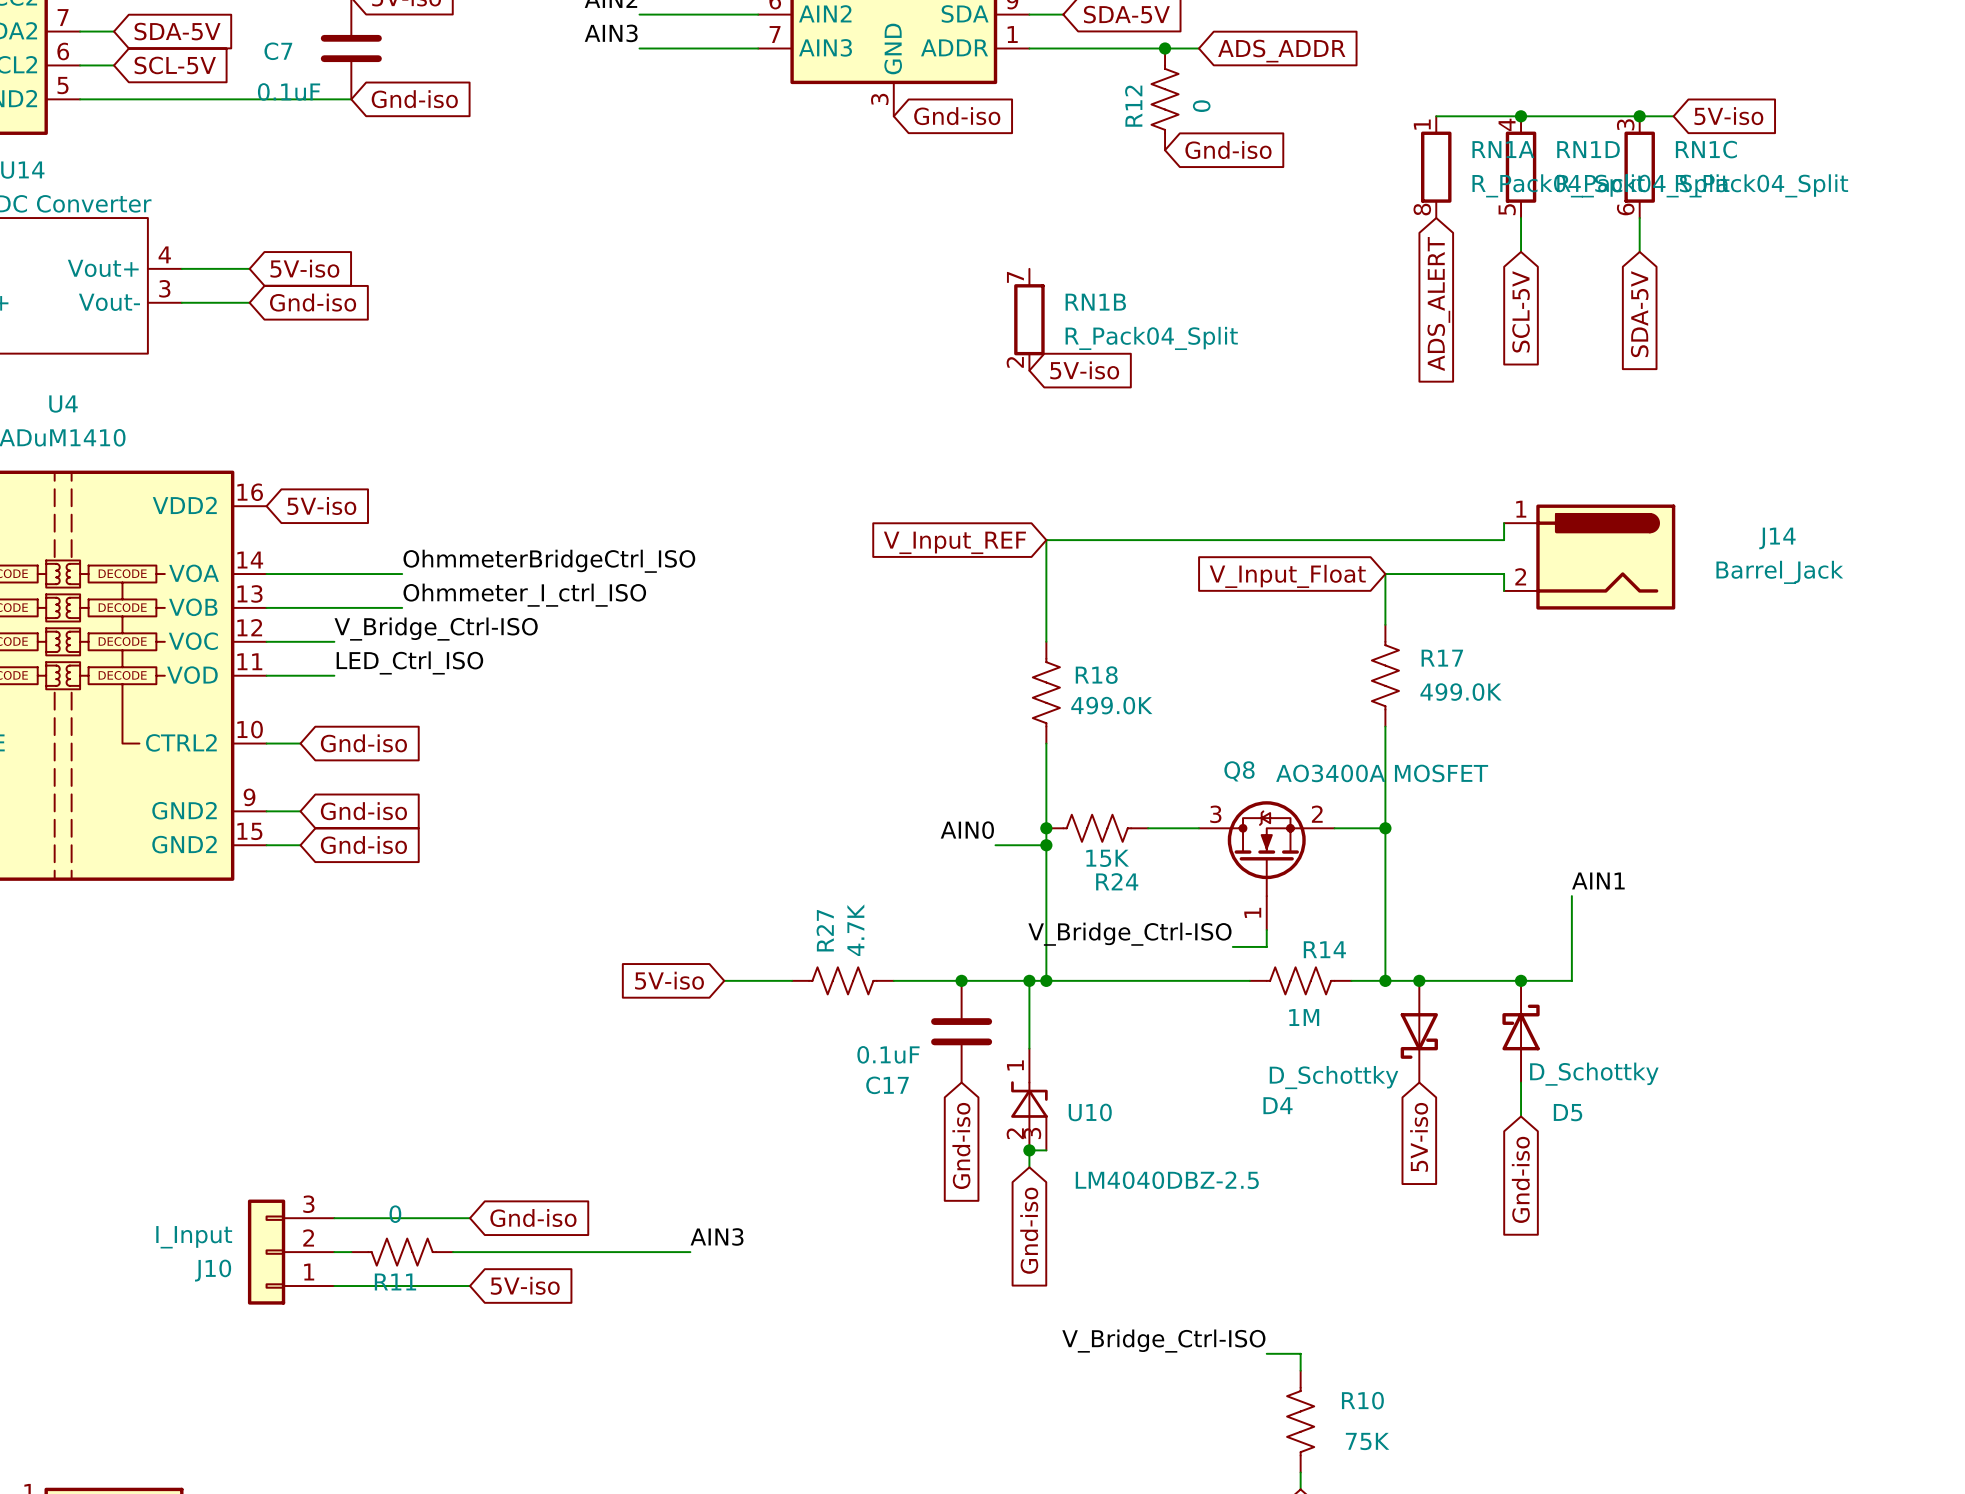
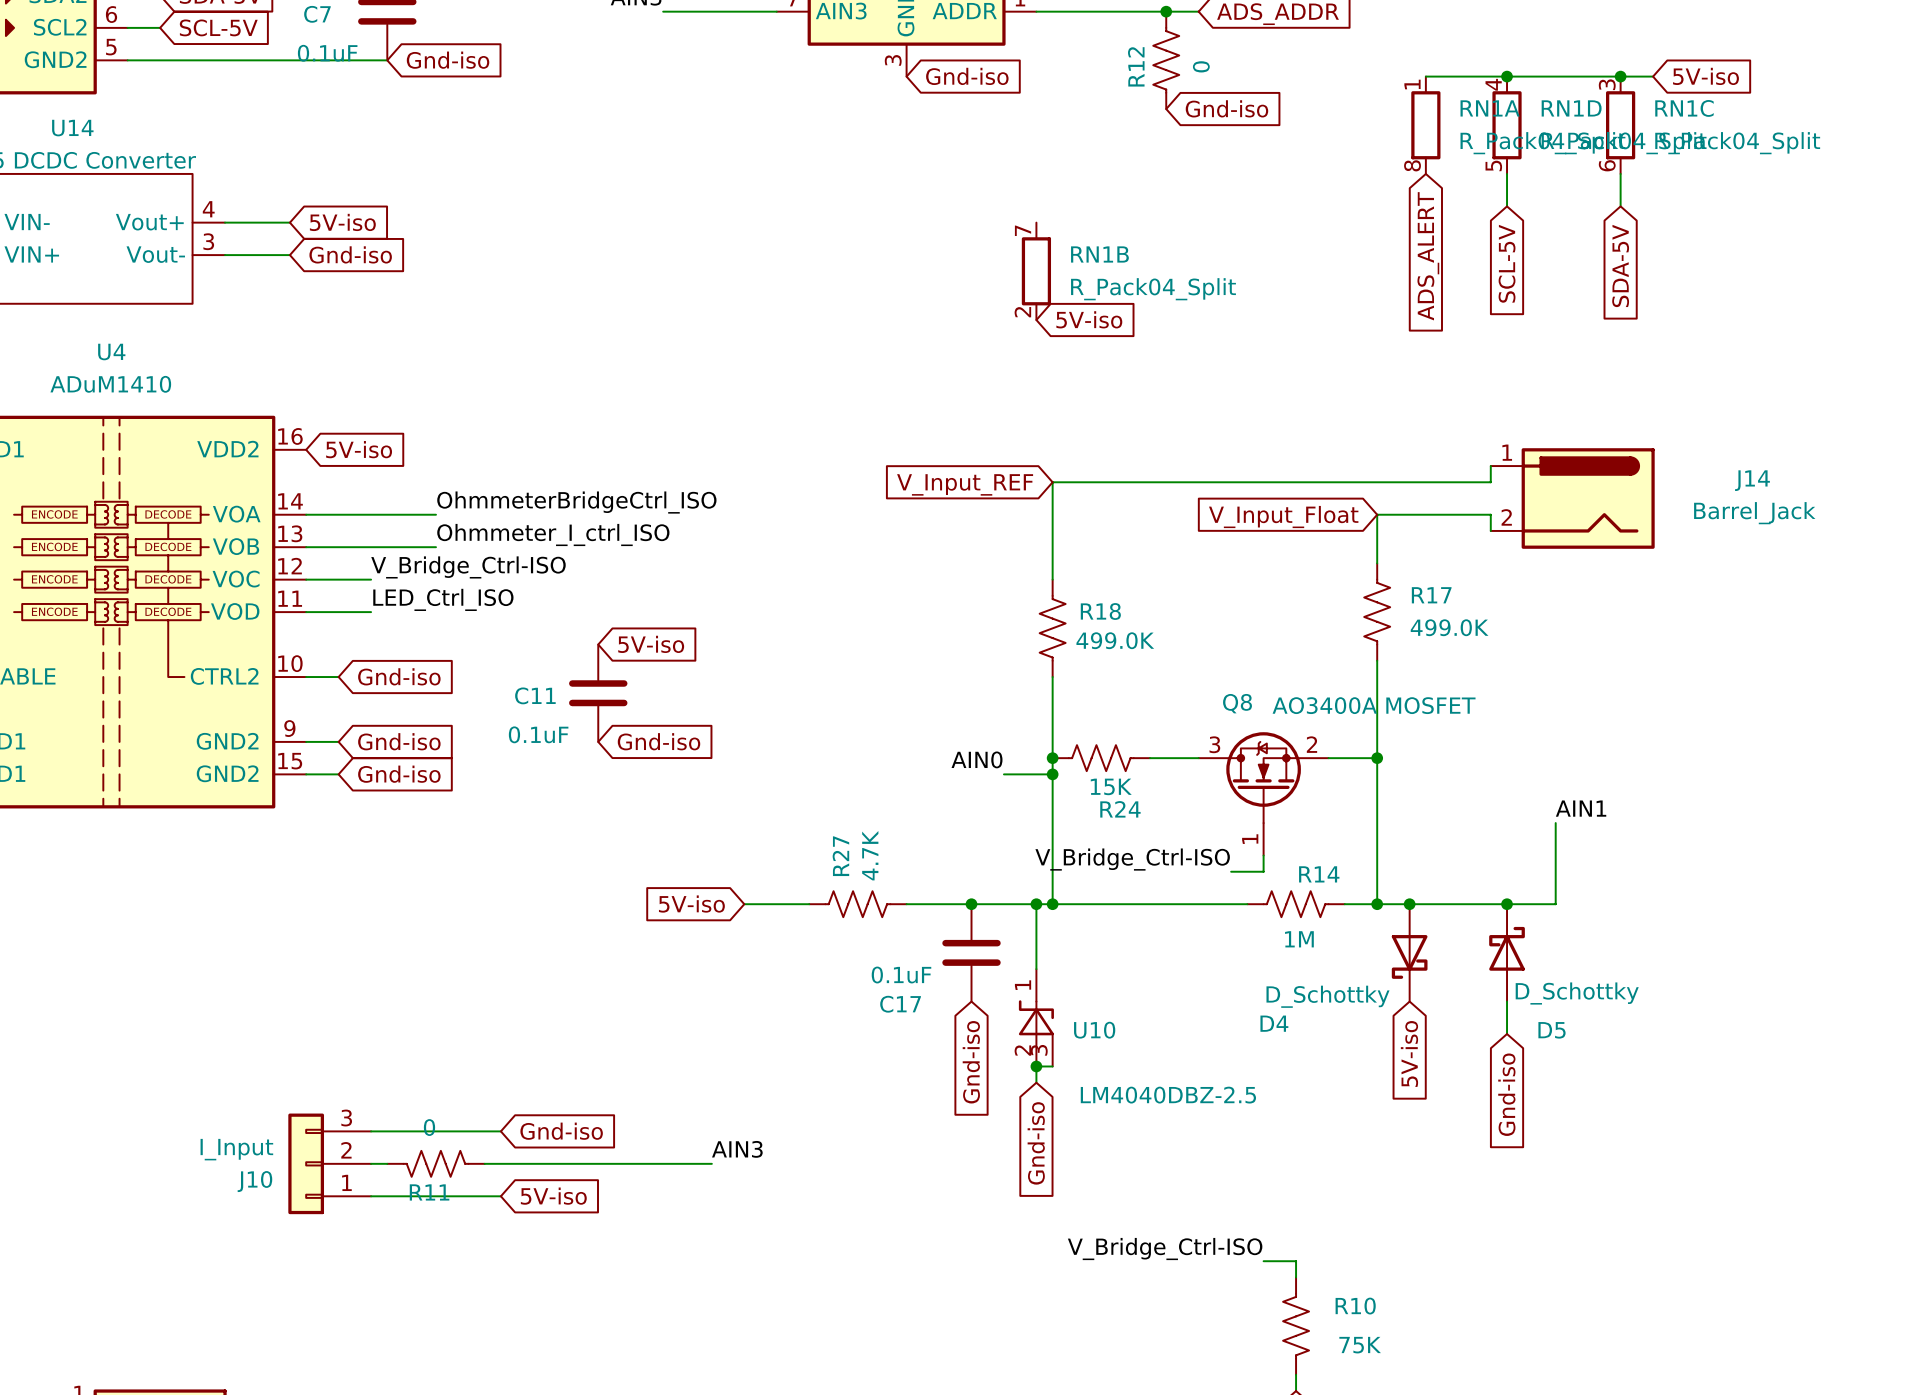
global label: none -> 5V-iso (651, 644)
C11: none -> 0.1uF (598, 693)
global label: none -> Gnd-iso (658, 741)

